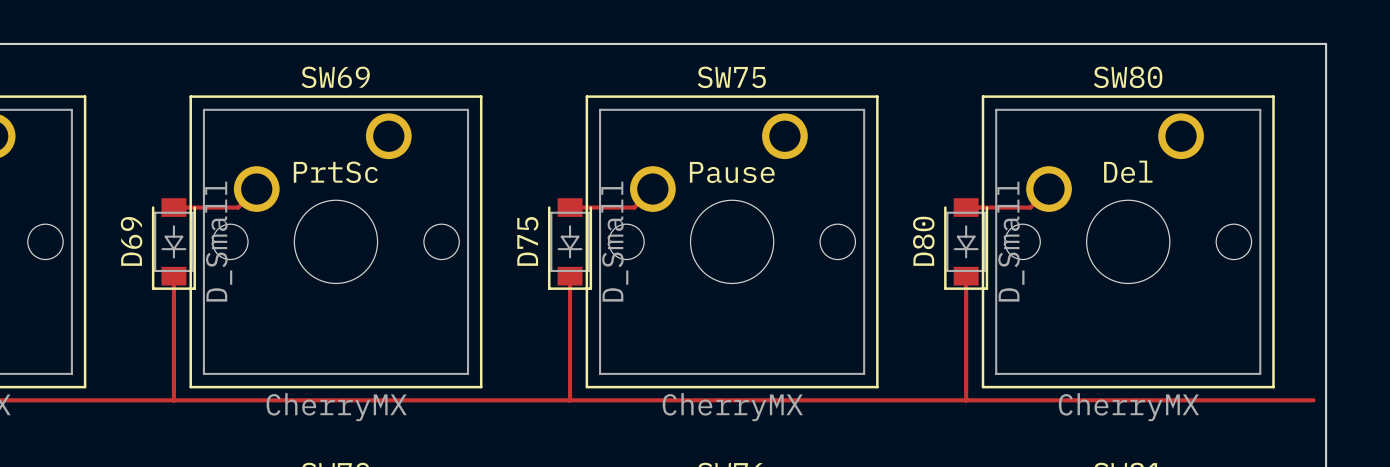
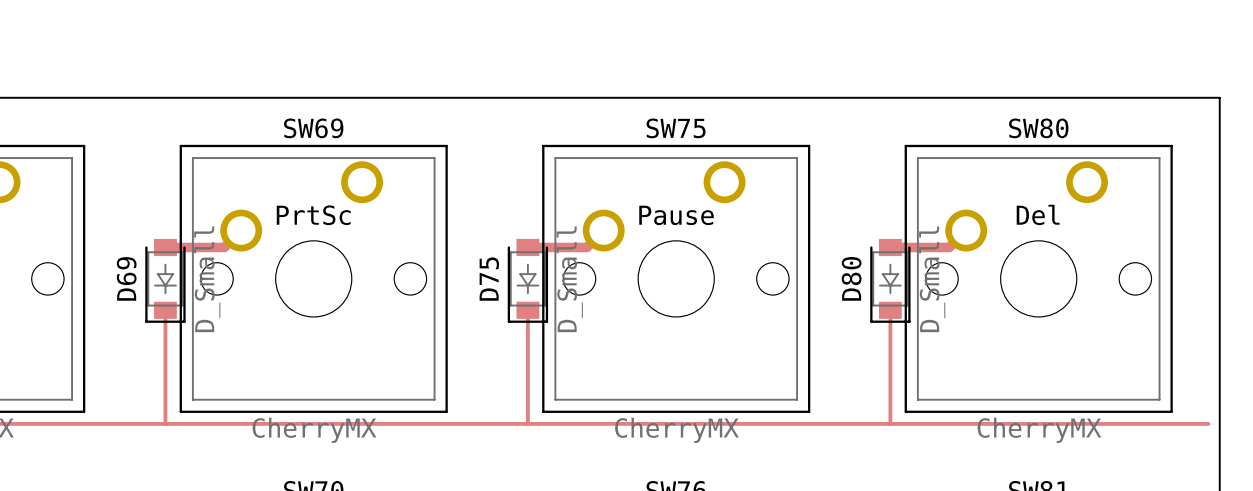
track width: thin (256, 189) (238, 207) (173, 207) -> thick (241, 230) (224, 247) (165, 247)
track width: thin (652, 189) (634, 207) (570, 207) -> thick (603, 230) (586, 247) (527, 247)
track width: thin (1049, 189) (1030, 207) (966, 207) -> thick (966, 230) (949, 247) (890, 247)

